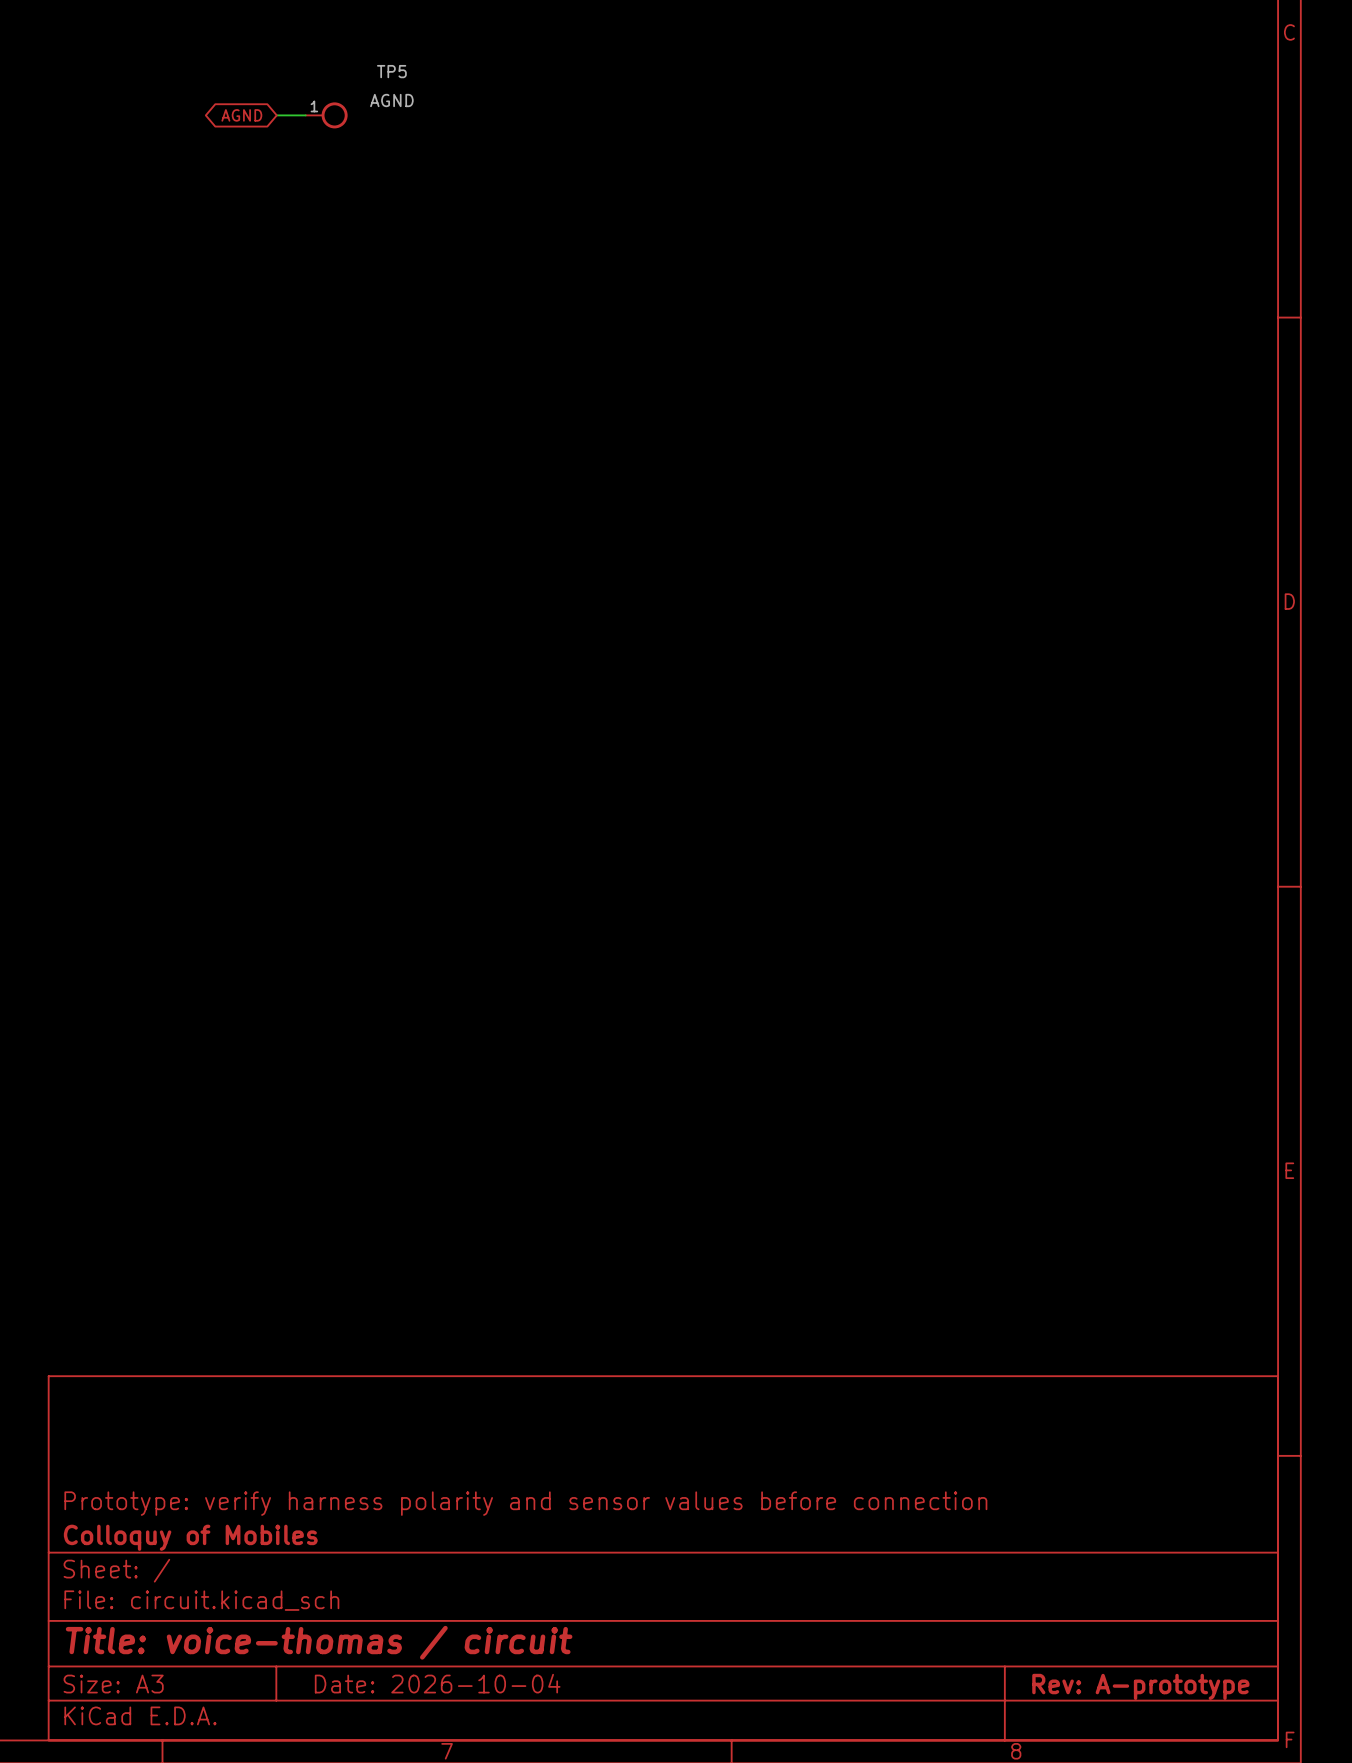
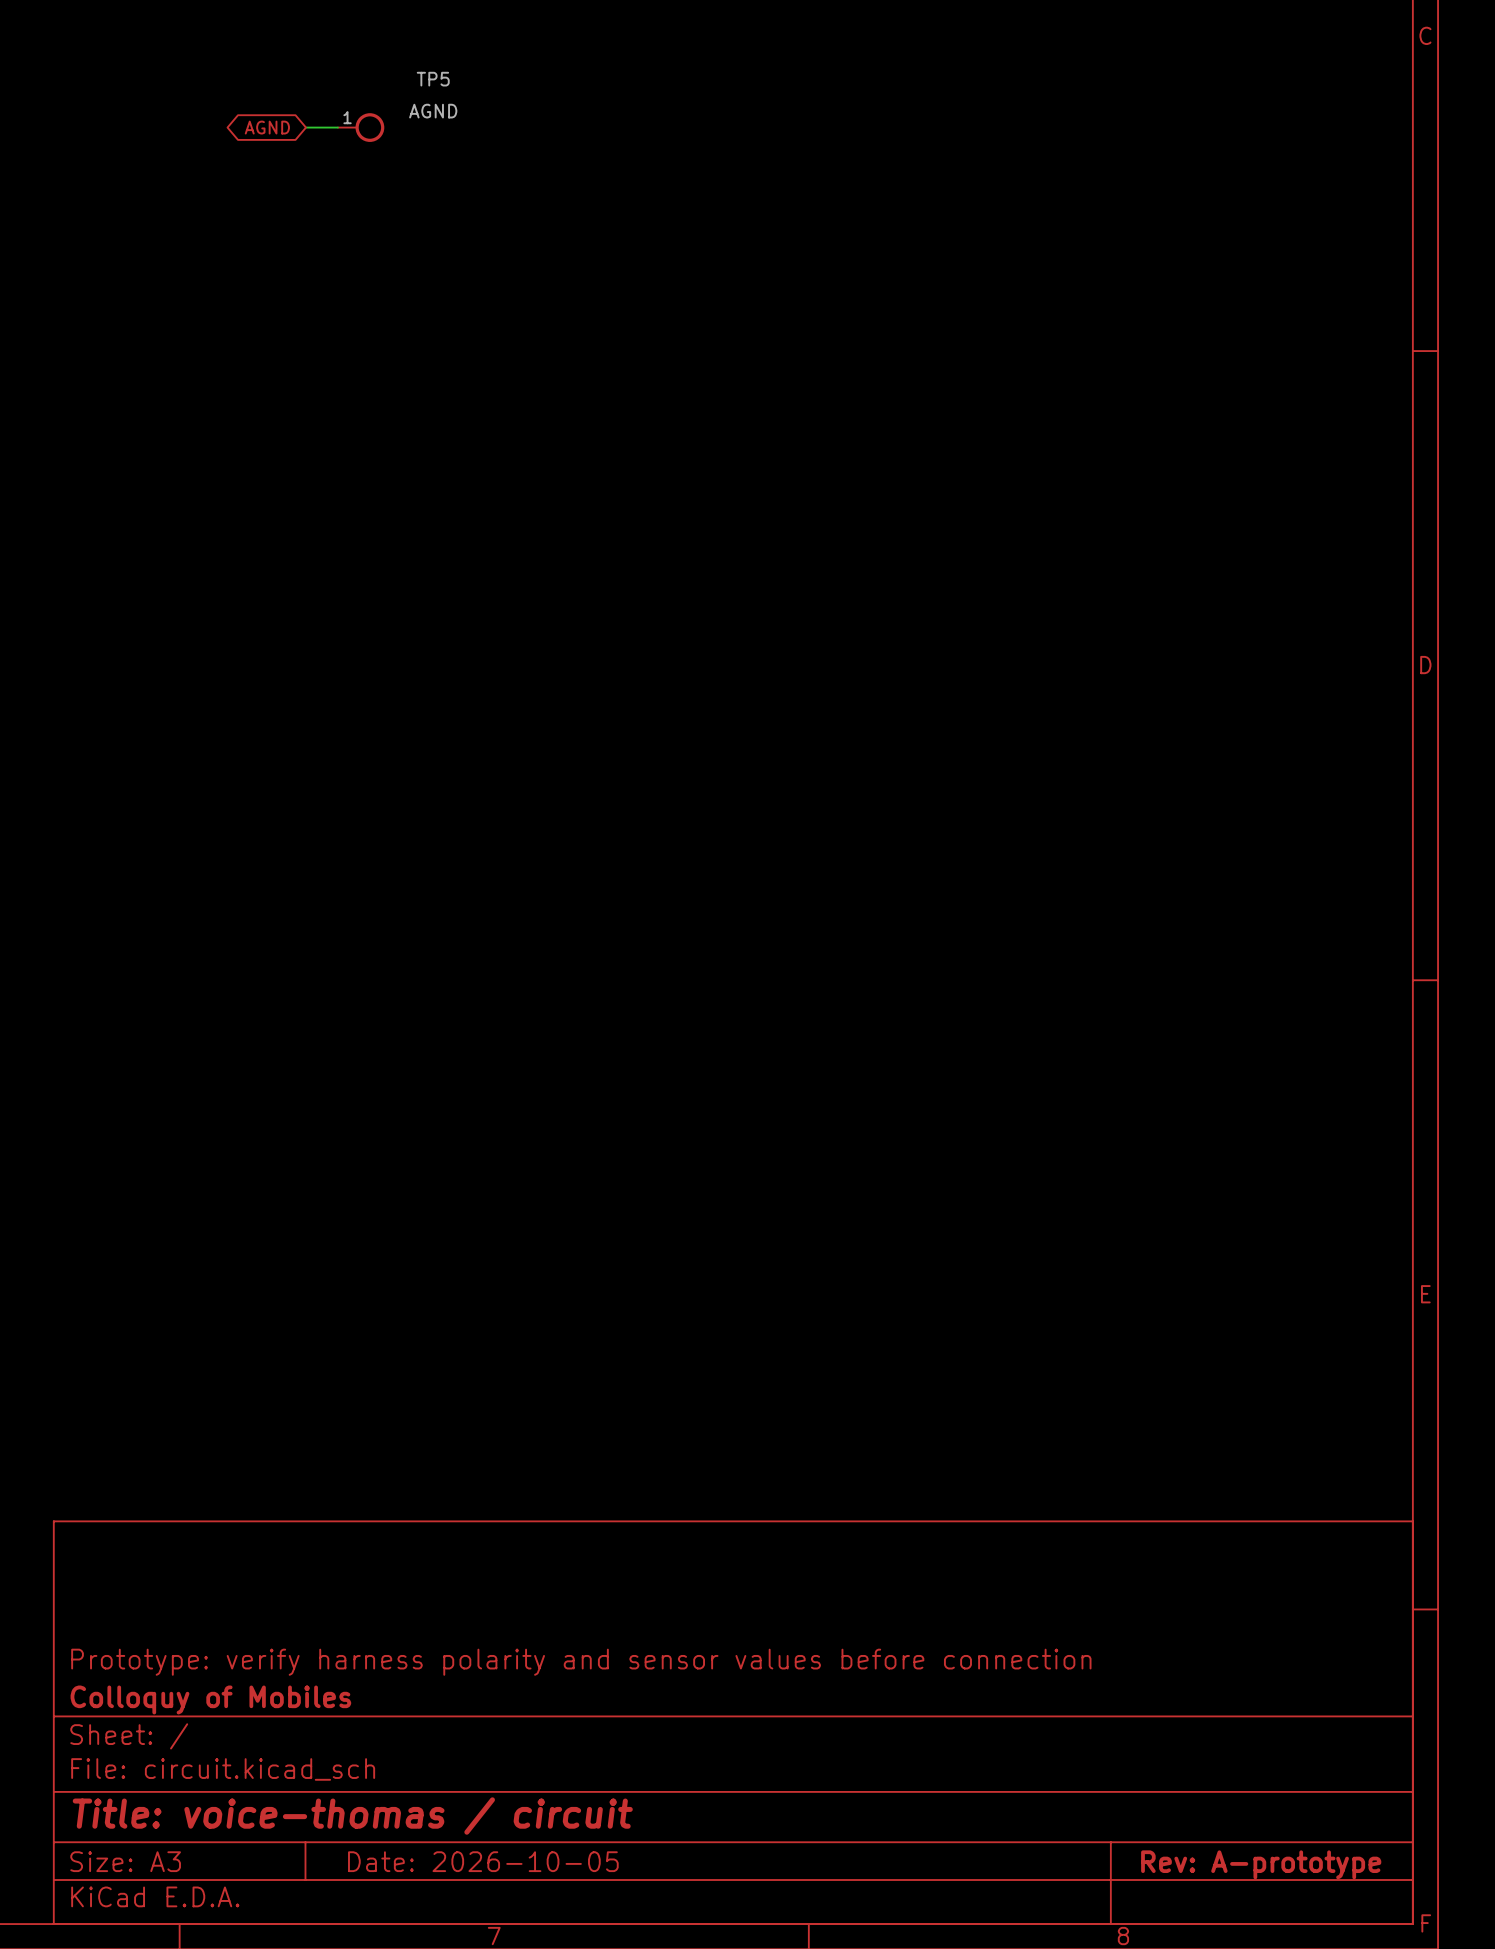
title block: Date: 2026-10-04 (437, 1683) -> Date: 2026-10-05 (483, 1861)

